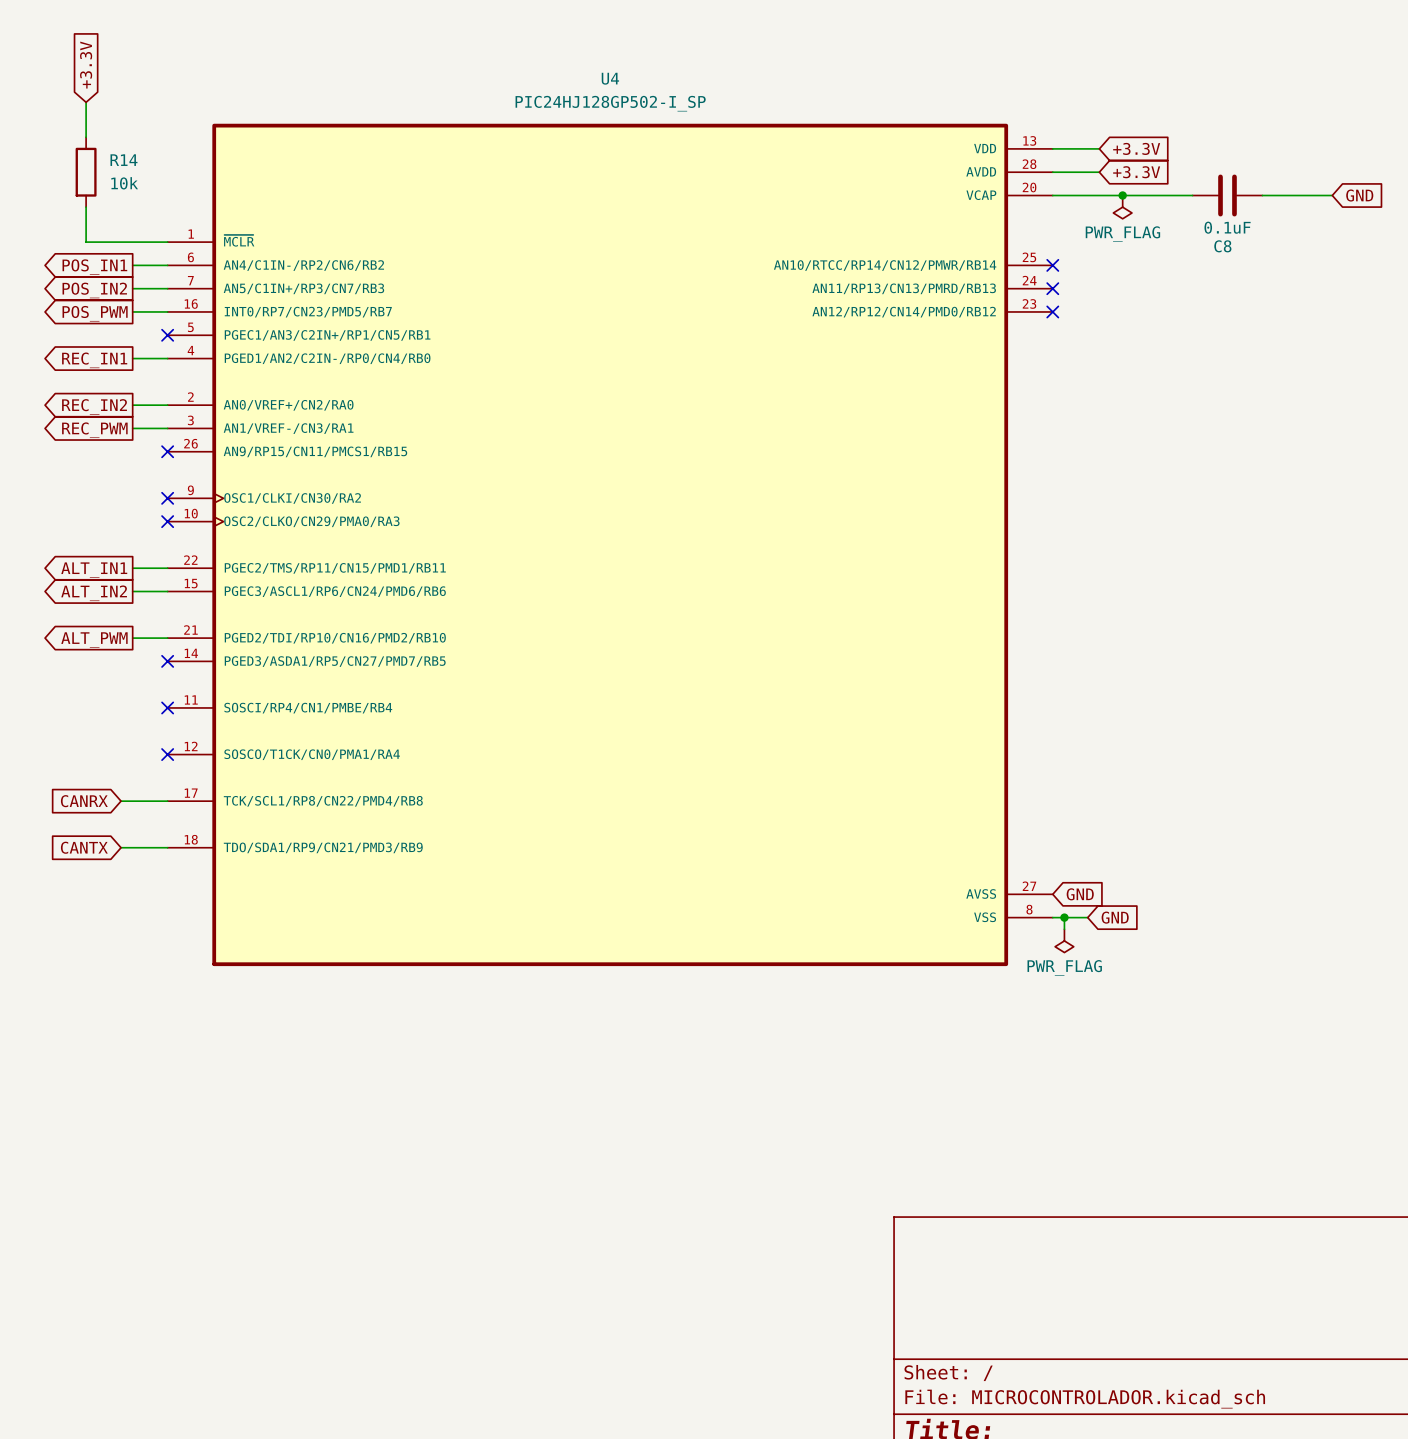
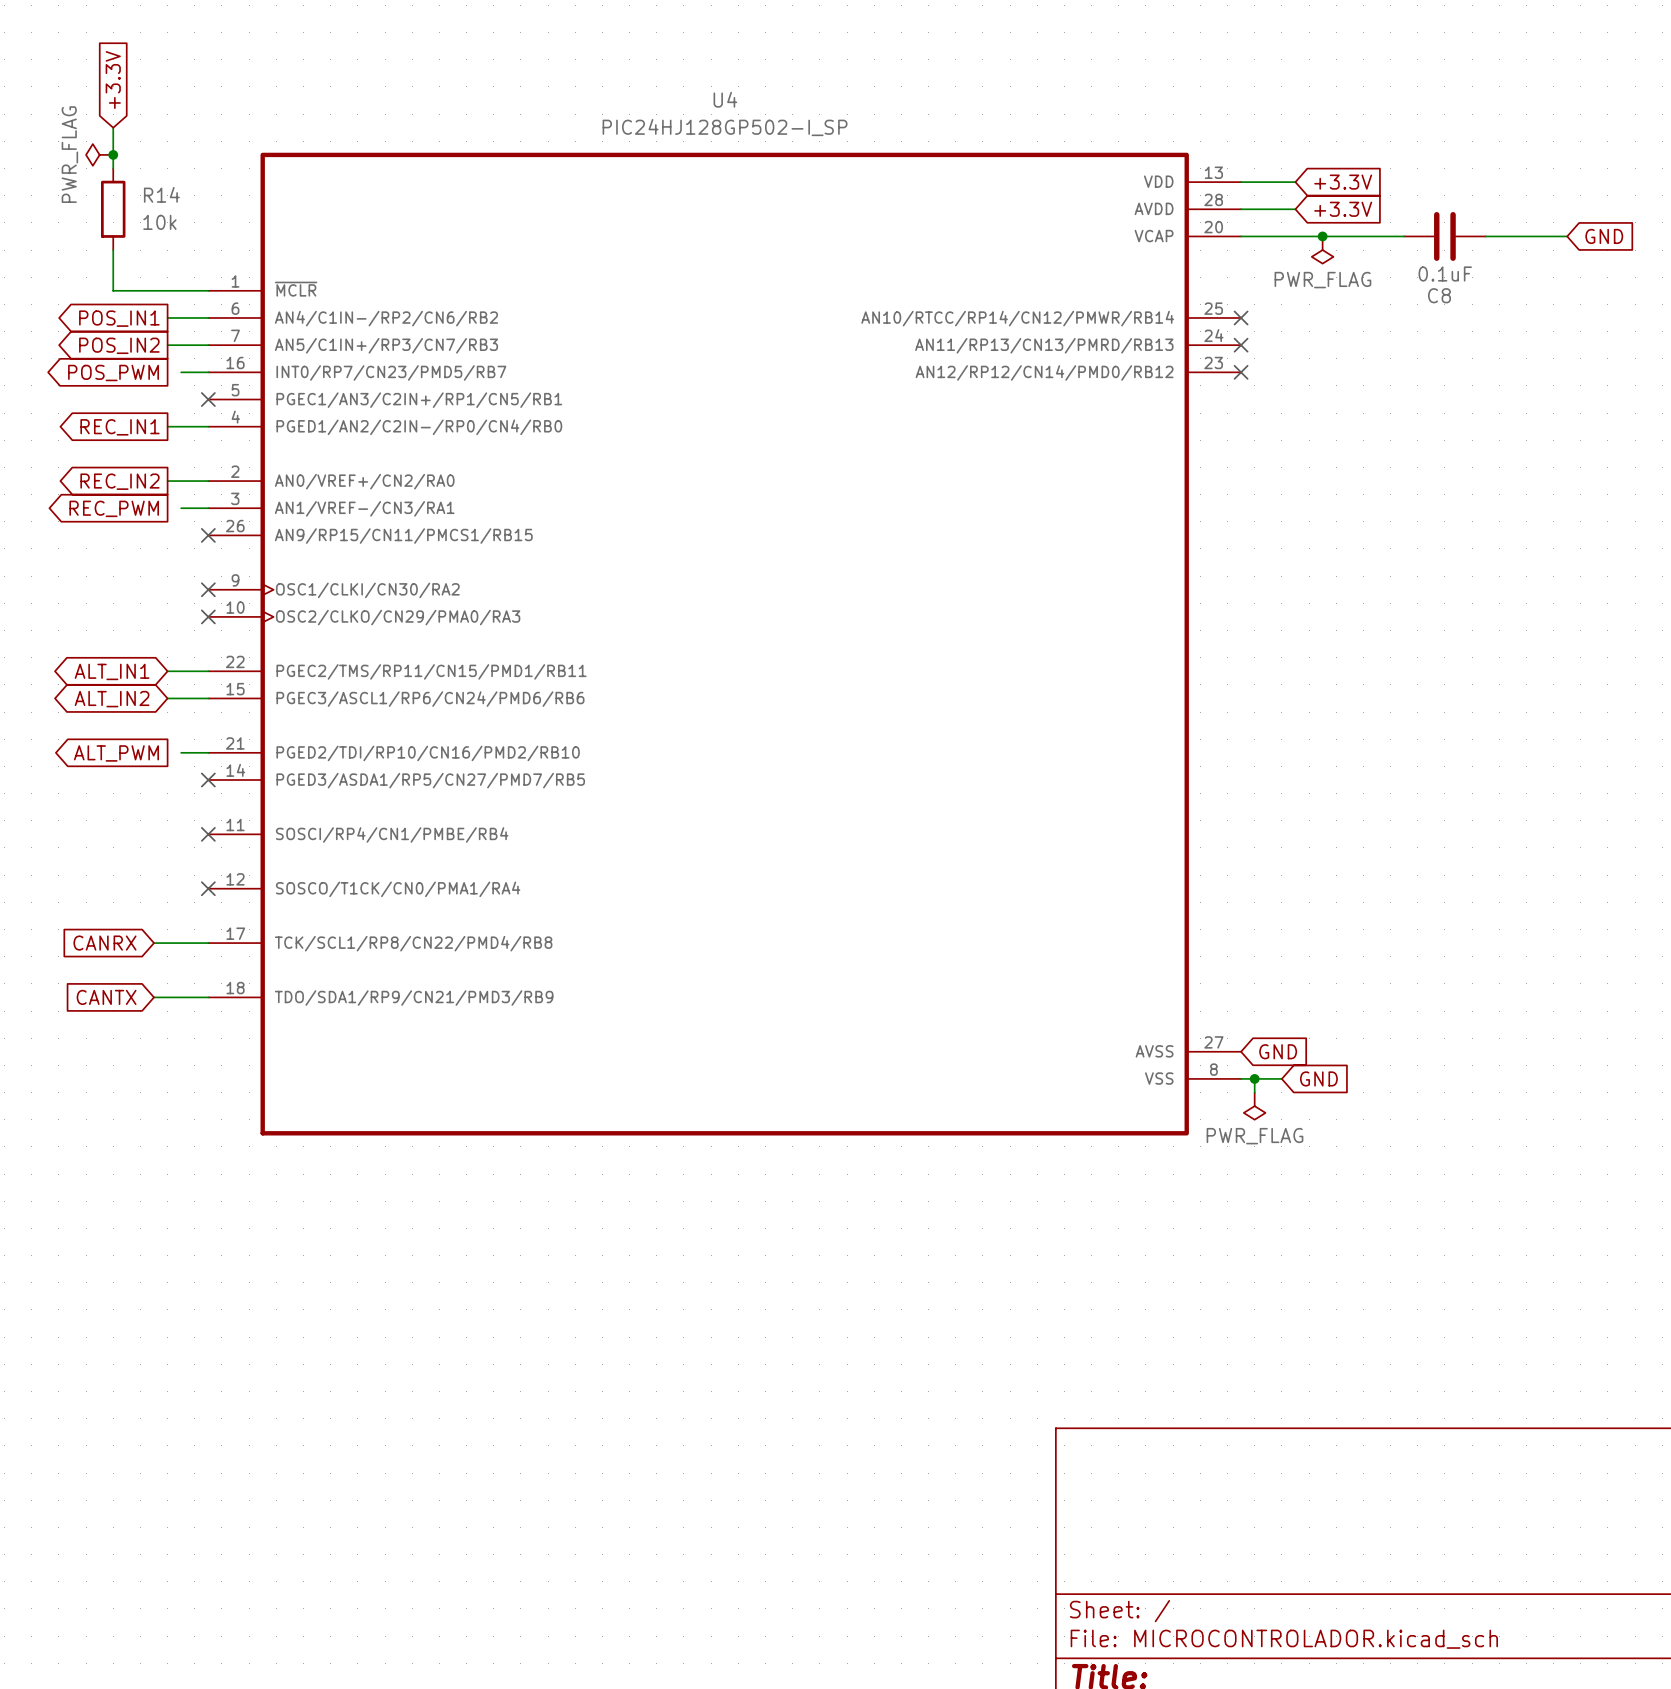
power symbol: none -> PWR_FLAG (99, 154)
junction: none -> (113, 154)
wire: (132, 311) (144, 311) -> none
wire: (132, 428) (144, 428) -> none
global label shape: output (94, 570) -> bidirectional (112, 671)
global label shape: output (94, 593) -> bidirectional (112, 699)
wire: (132, 638) (144, 638) -> none

